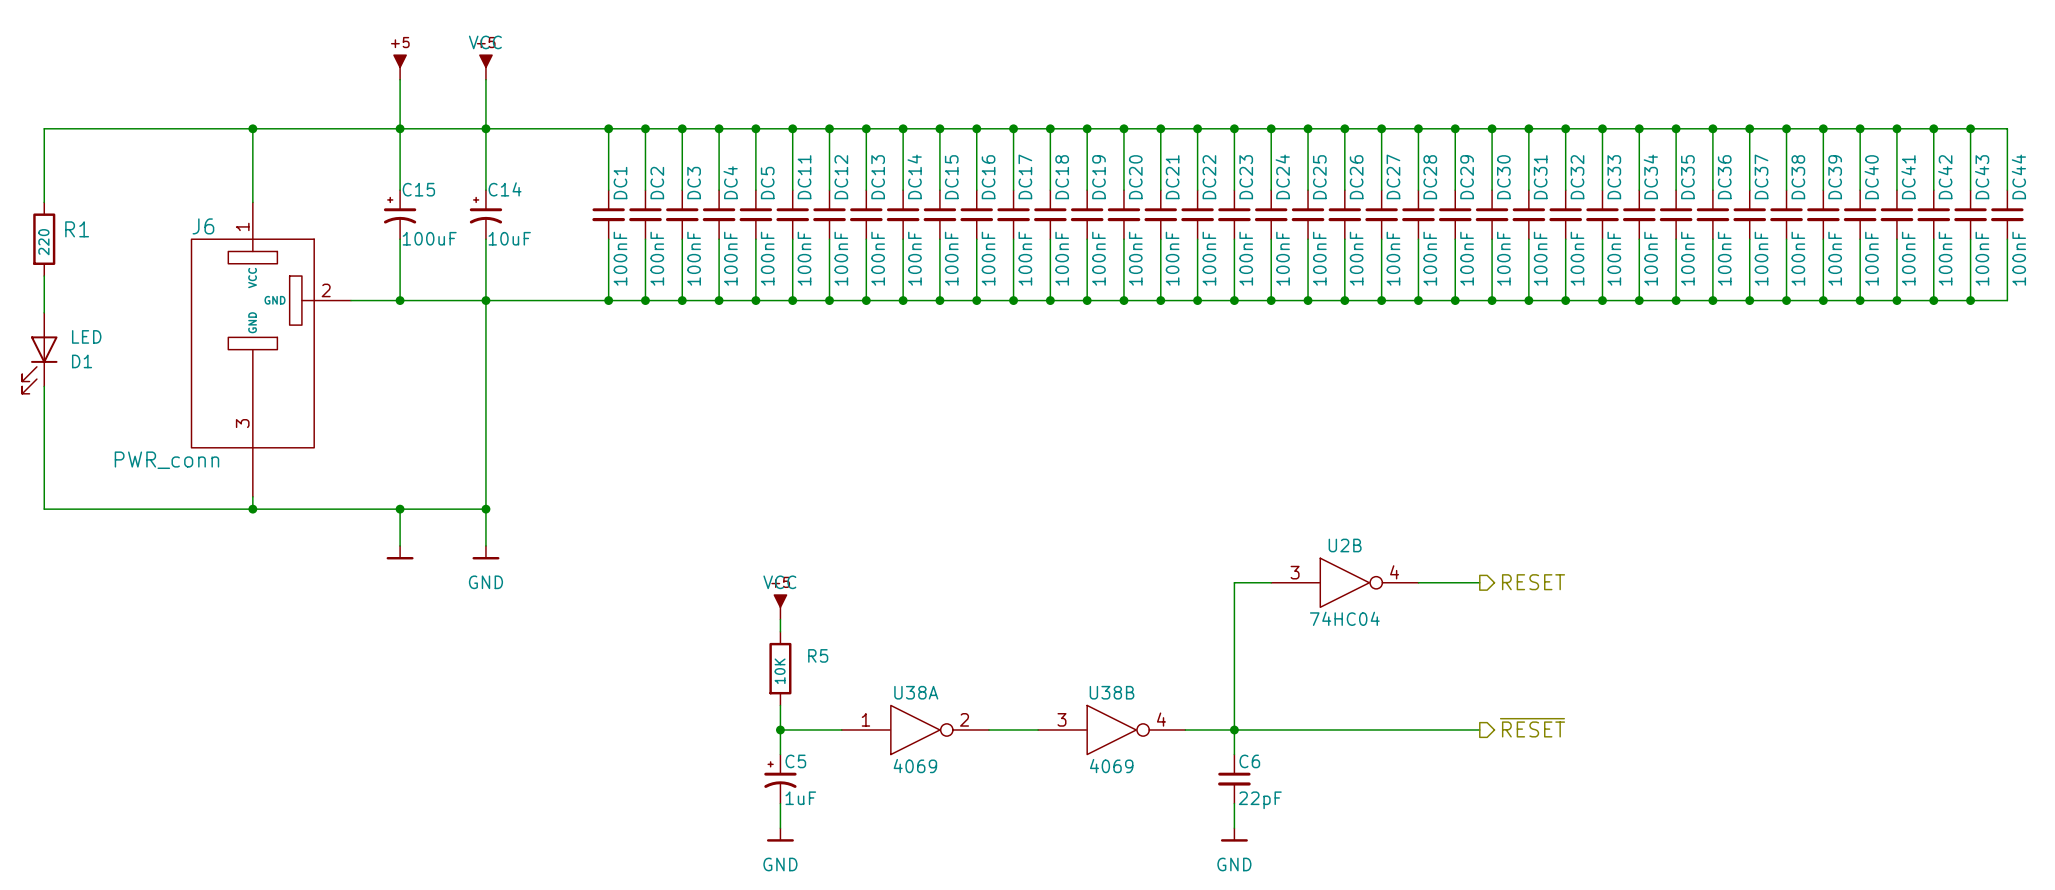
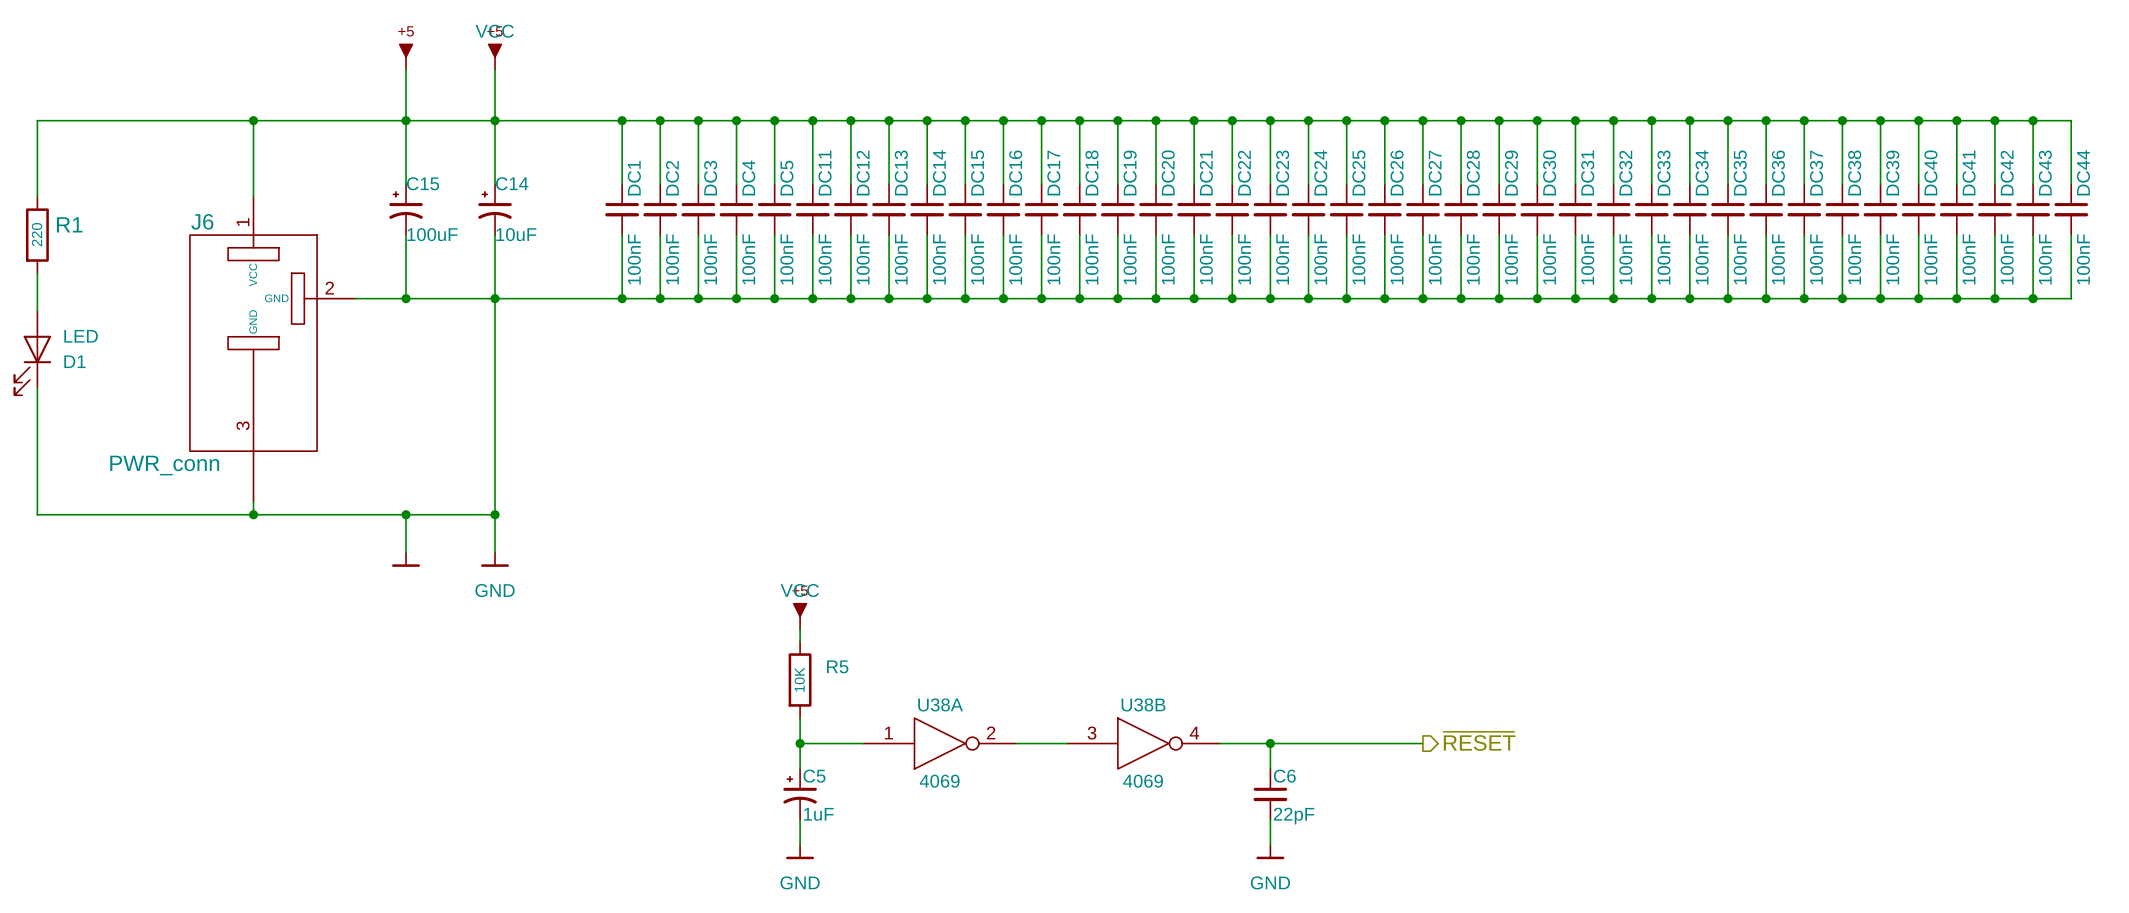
wire: (1271, 582) (1234, 582) (1234, 729) -> none
U2B: 74HC04 (1344, 582) -> none
wire: (1418, 582) (1479, 582) -> none
hierarchical label: RESET (1533, 582) -> none
hierarchical label position: ~{RESET} (1532, 727) -> ~{RESET} (1479, 741)
wire: (1381, 729) (1479, 729) -> none

